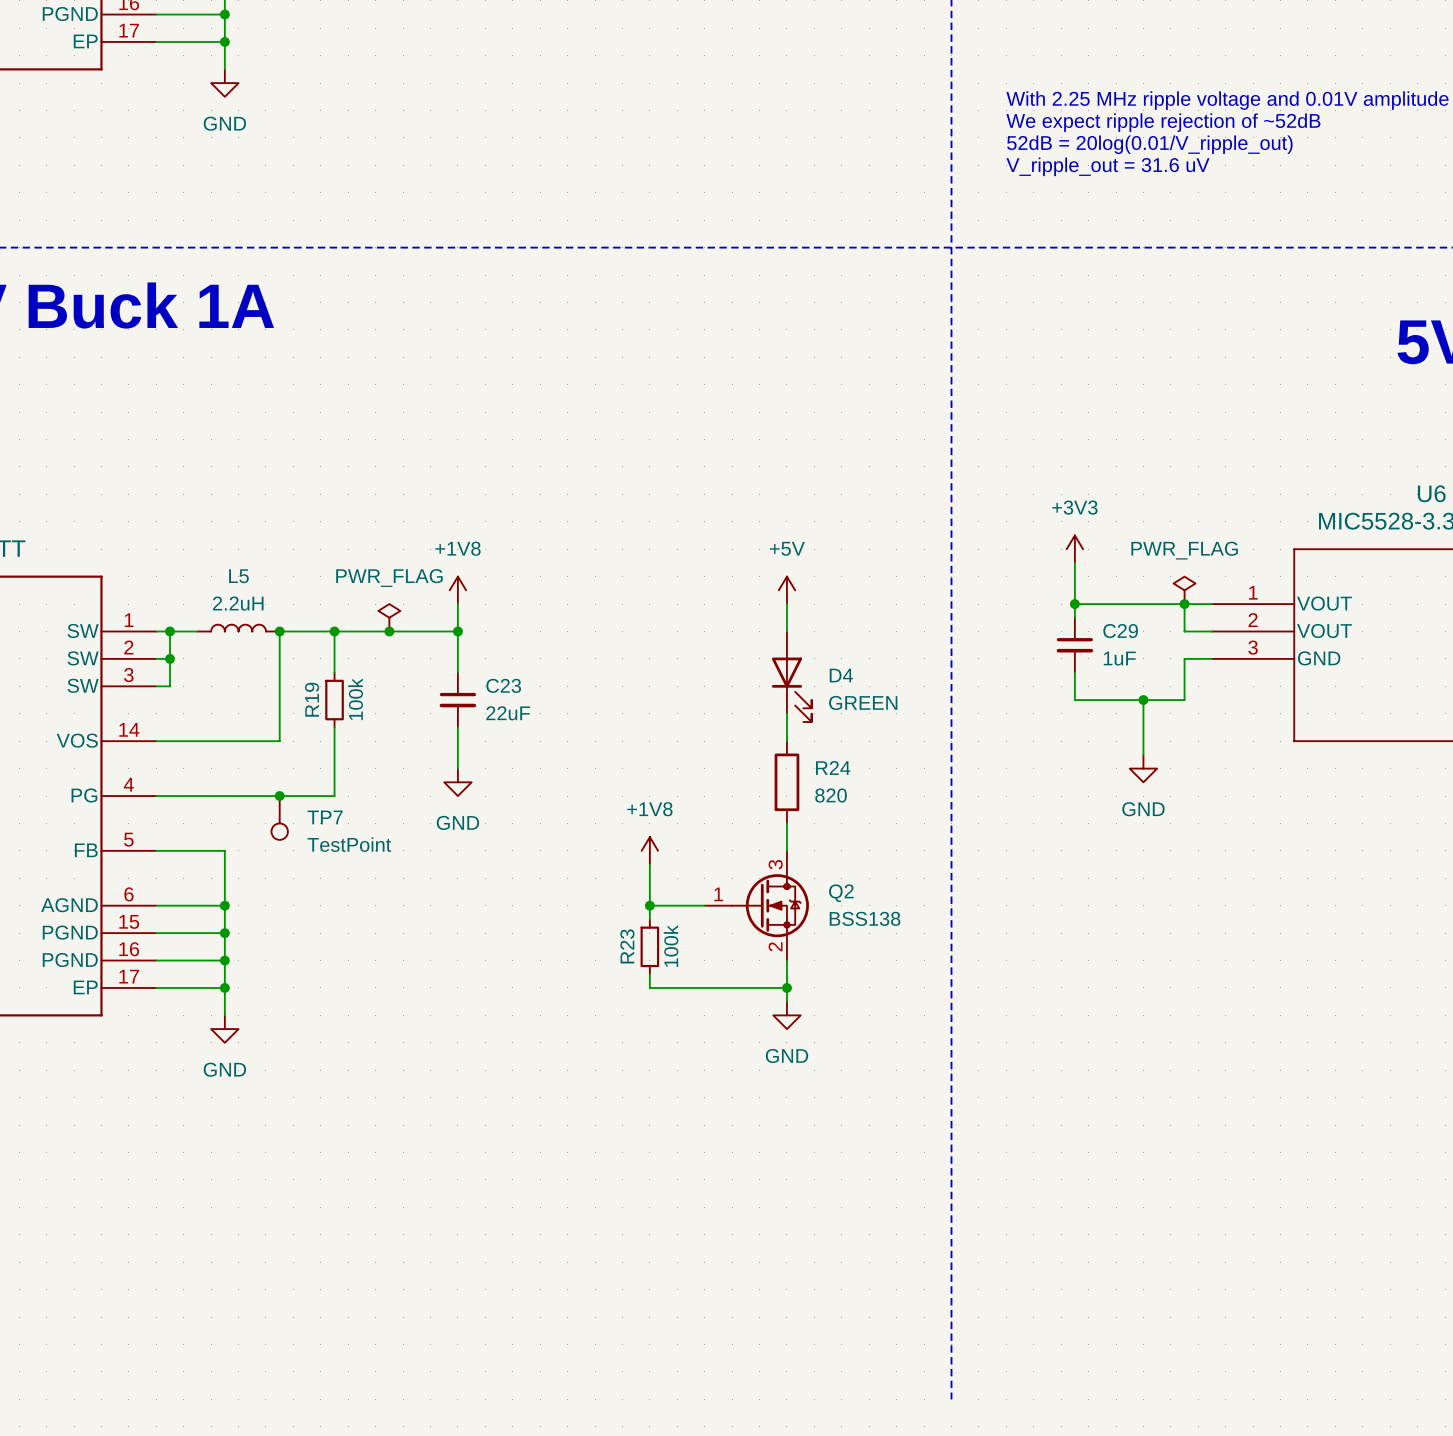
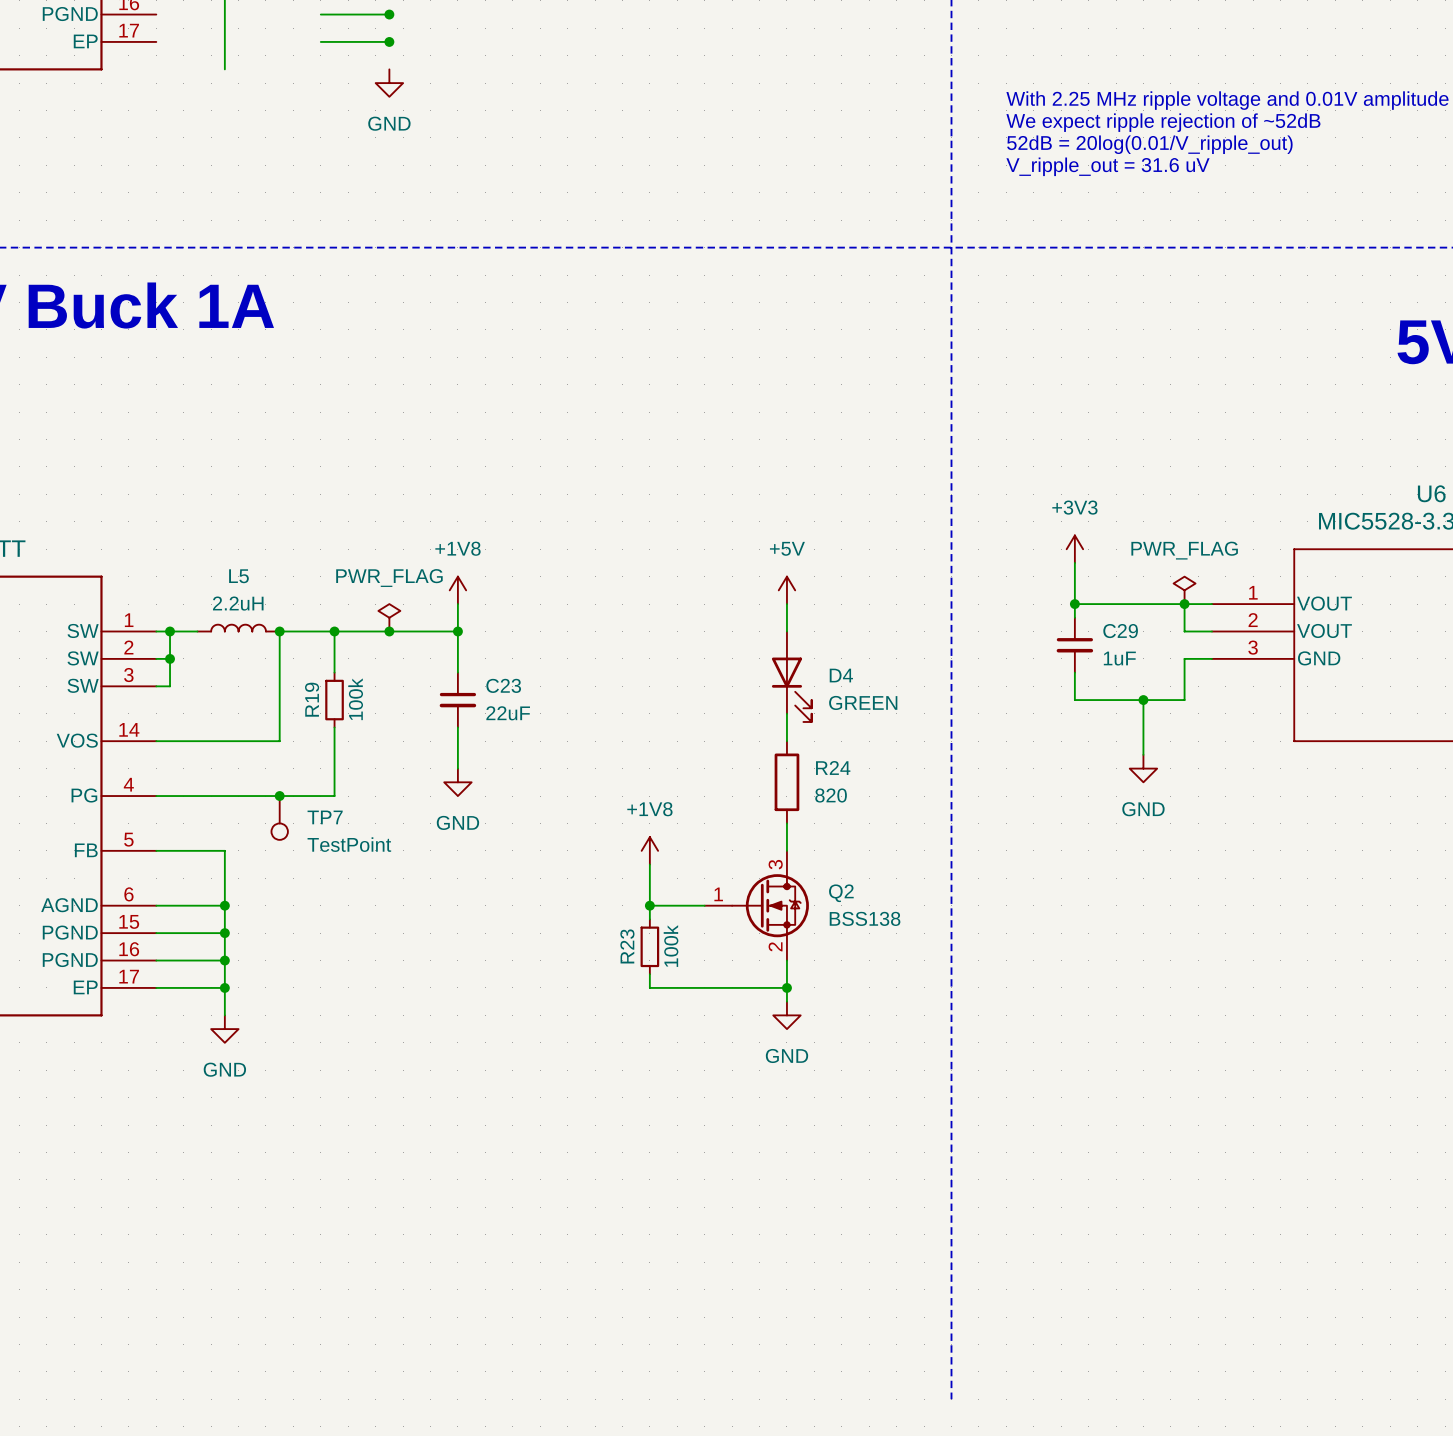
wire: (156, 14) (224, 14) -> (320, 14) (389, 14)
junction: (224, 14) -> none
junction: none -> (389, 14)
wire: (156, 41) (224, 41) -> (320, 41) (389, 41)
junction: (224, 41) -> none
junction: none -> (389, 41)
power symbol: GND (224, 83) -> none
power symbol: none -> GND (389, 83)

